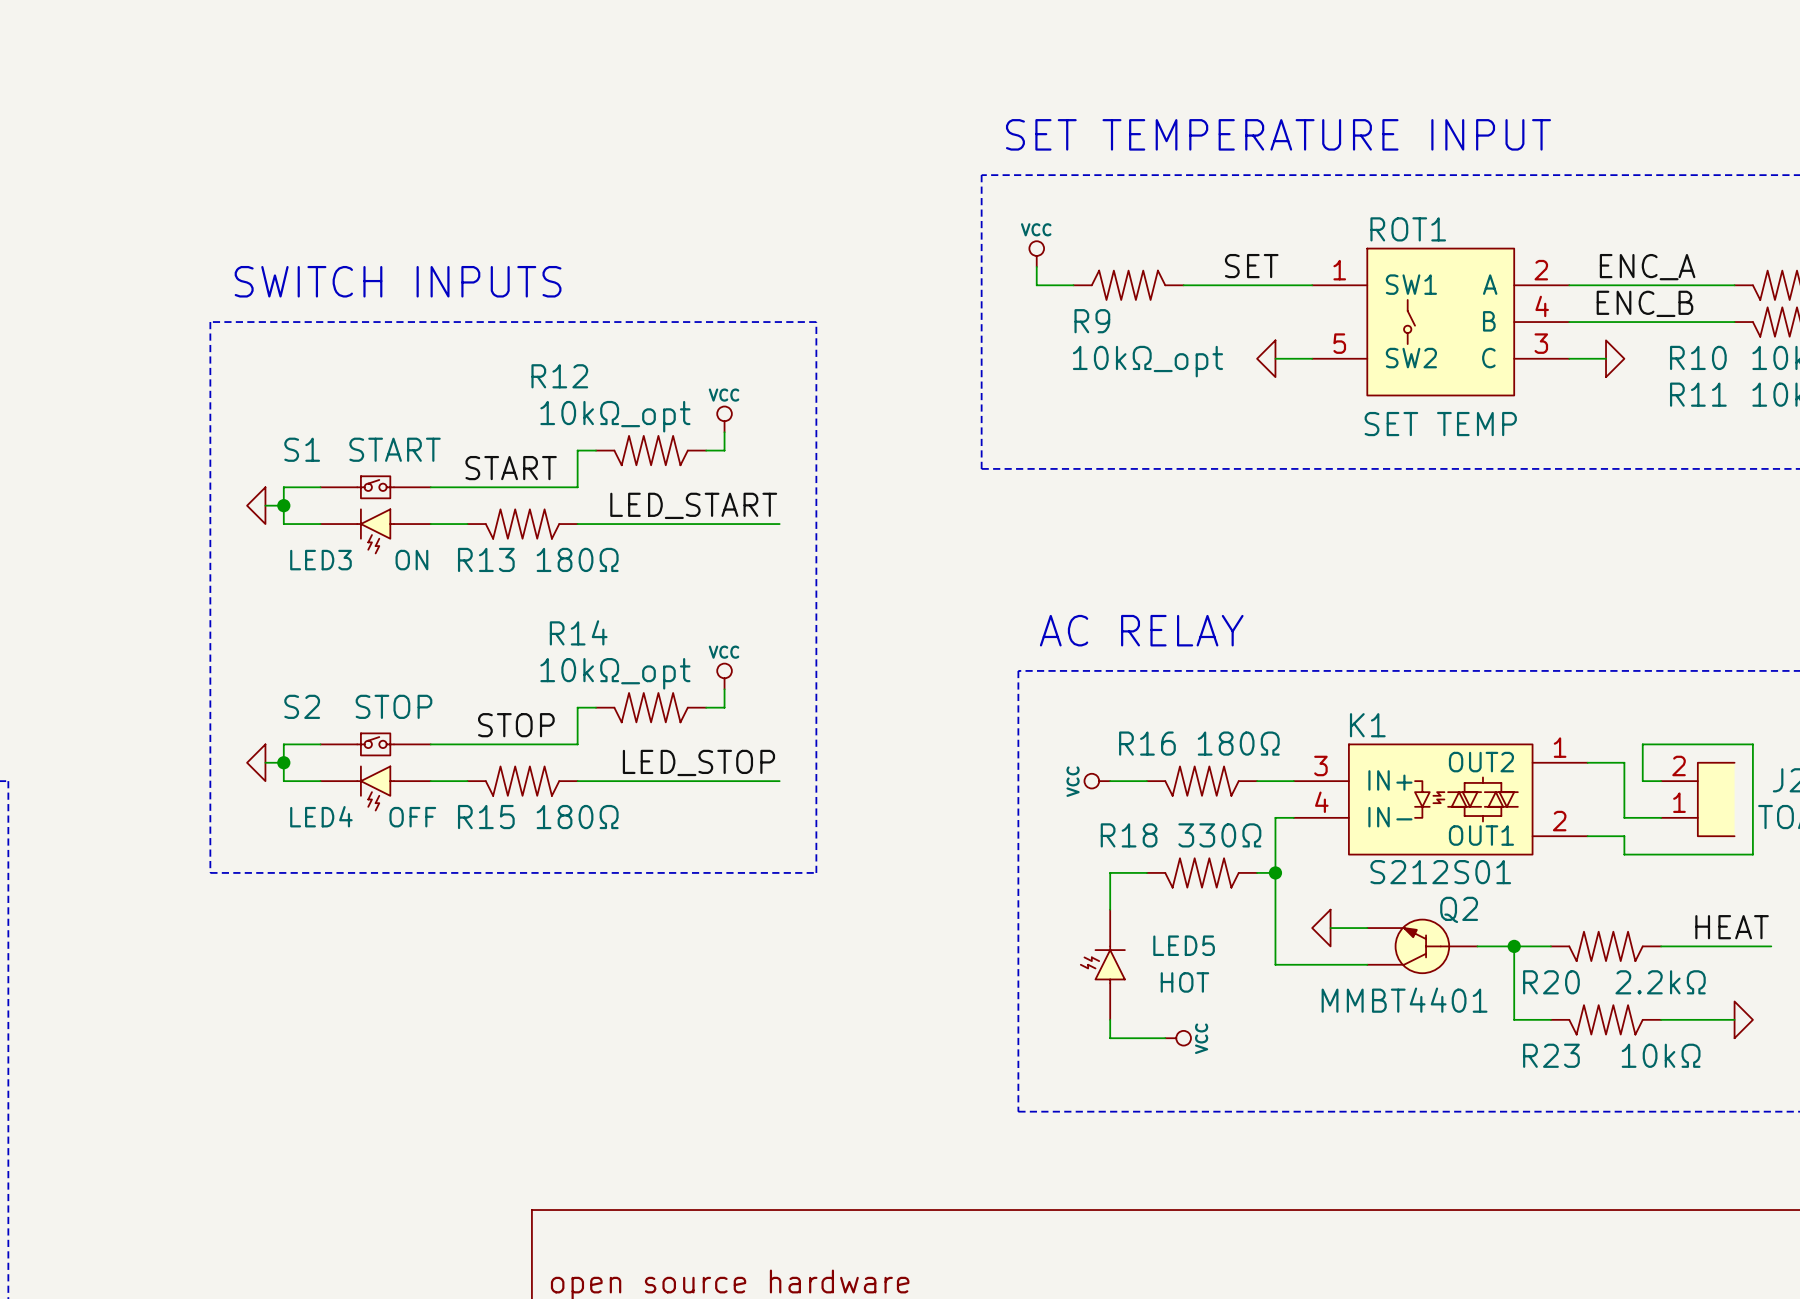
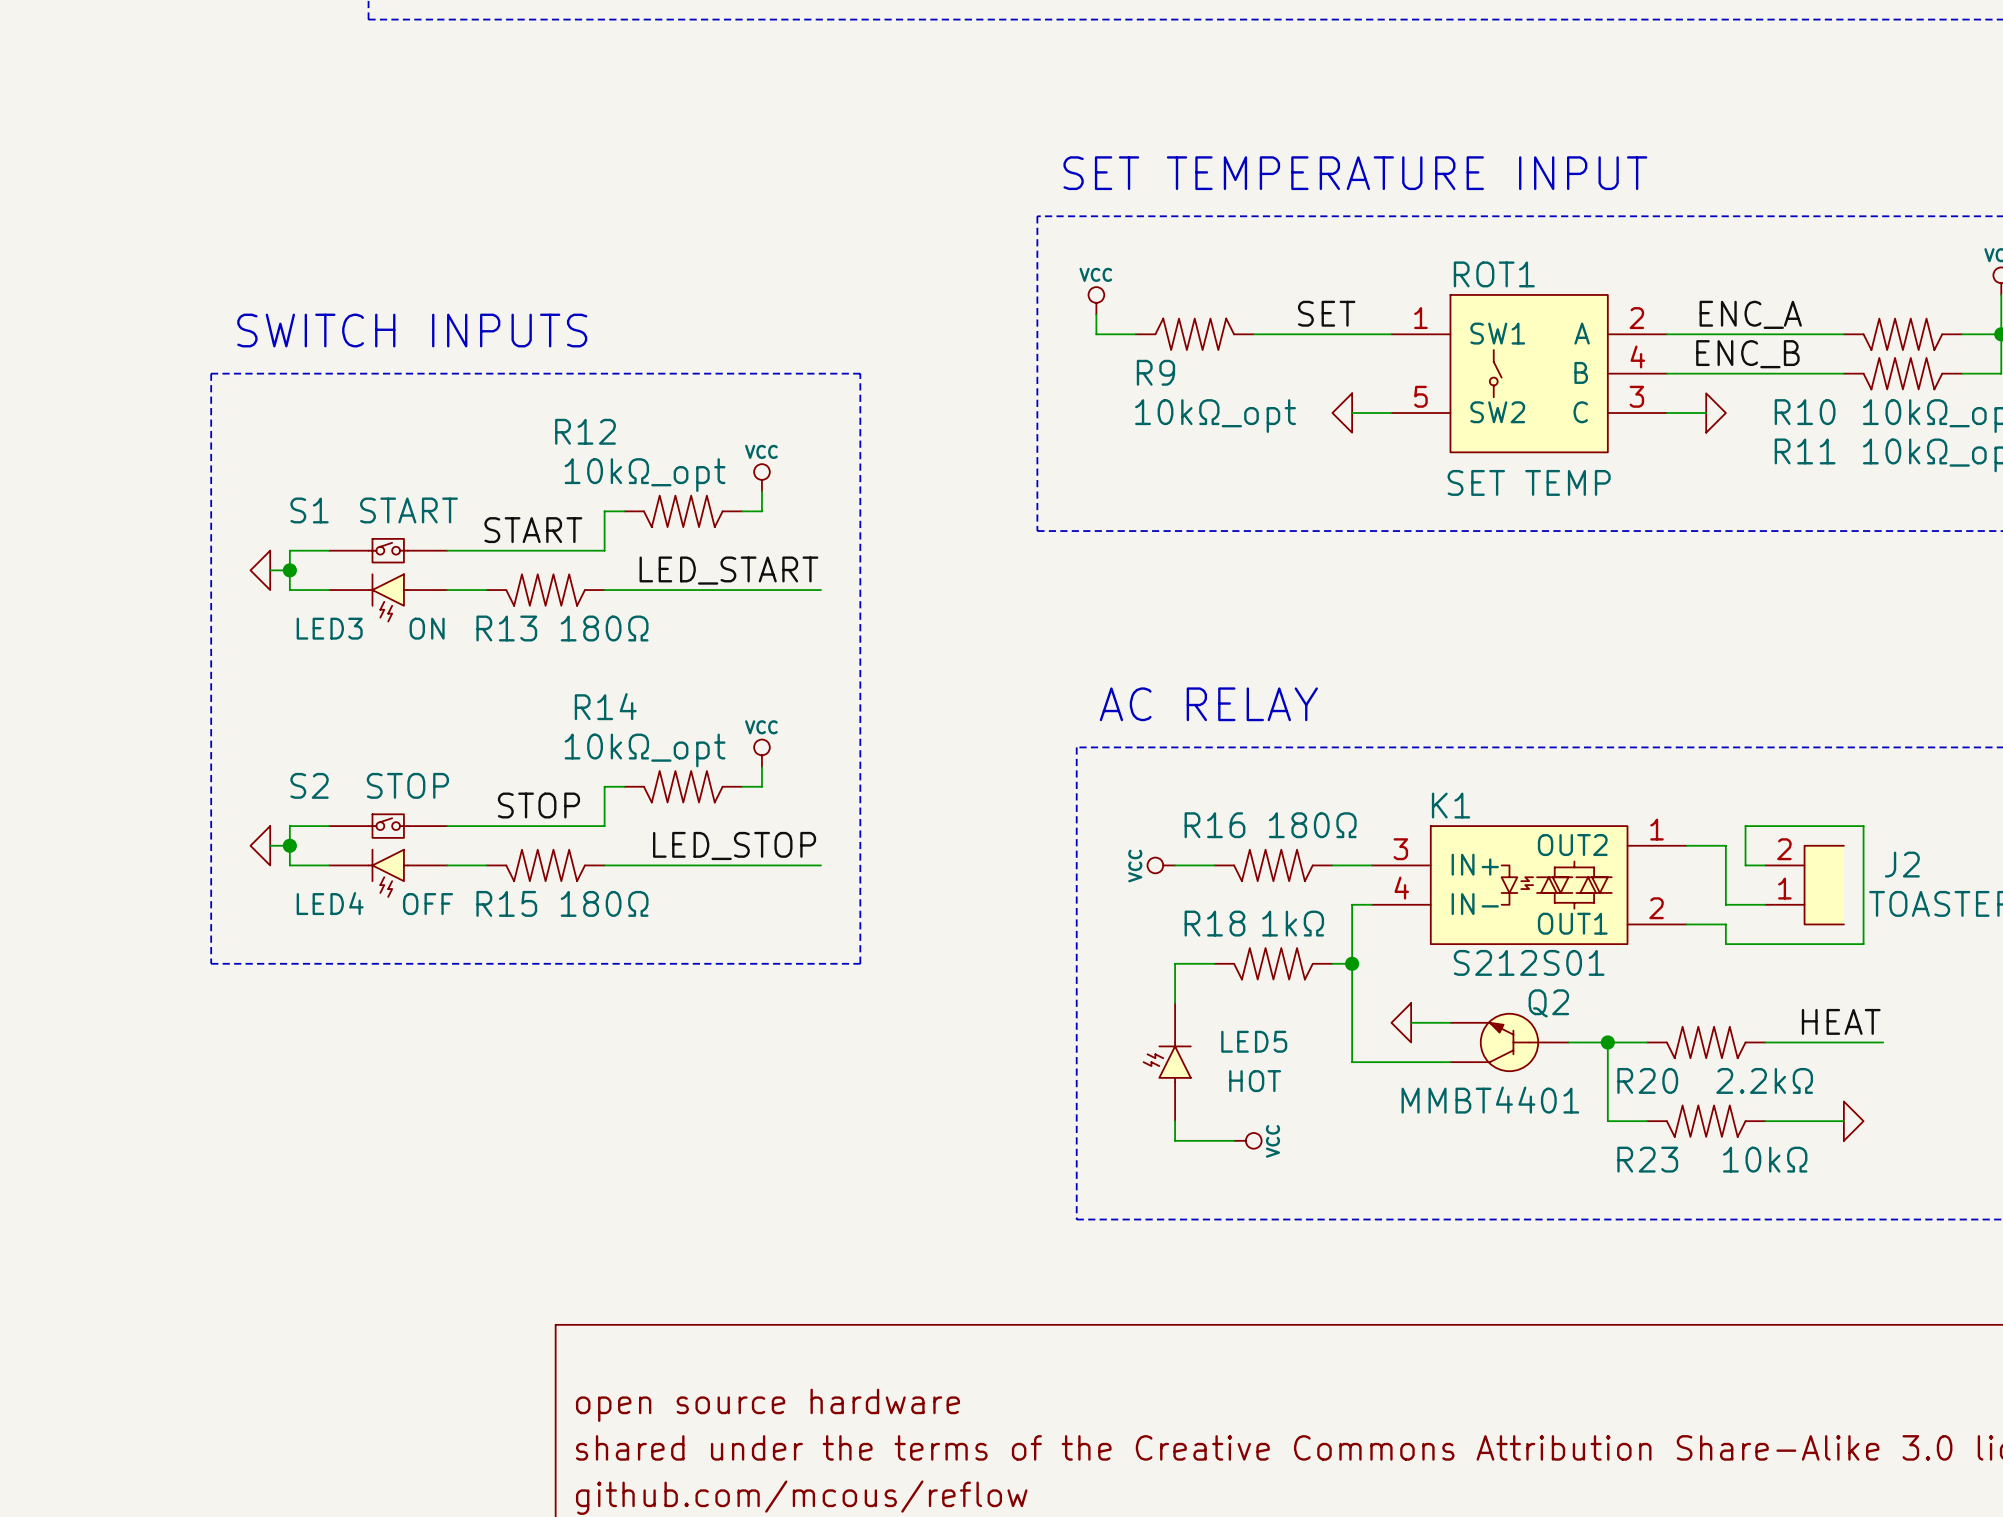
R18 name position: R18 (1129, 835) -> R18 (1214, 923)
R18 value: 330Ω (1219, 835) -> 1kΩ (1293, 923)

